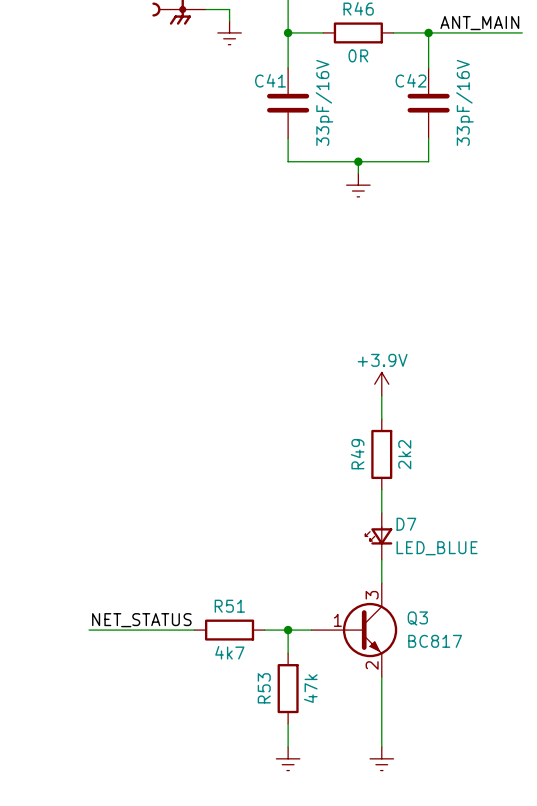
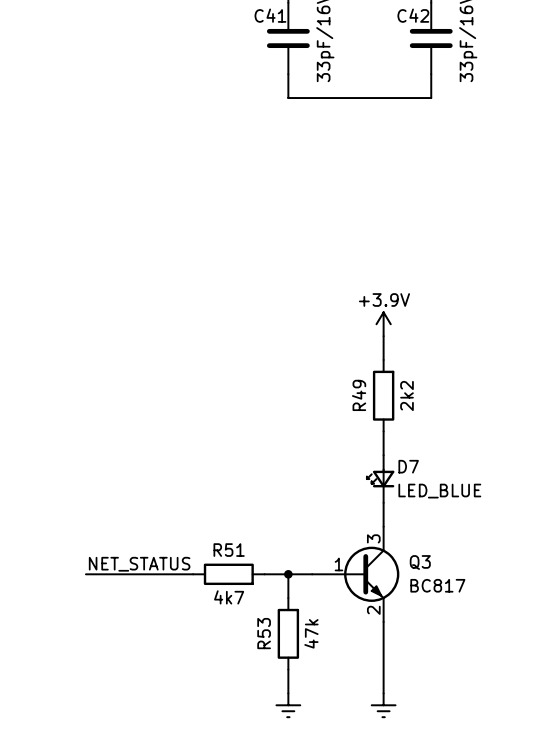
wire: (358, 161) (358, 173) -> none
junction: (358, 161) -> none
power symbol: (358, 185) -> none

